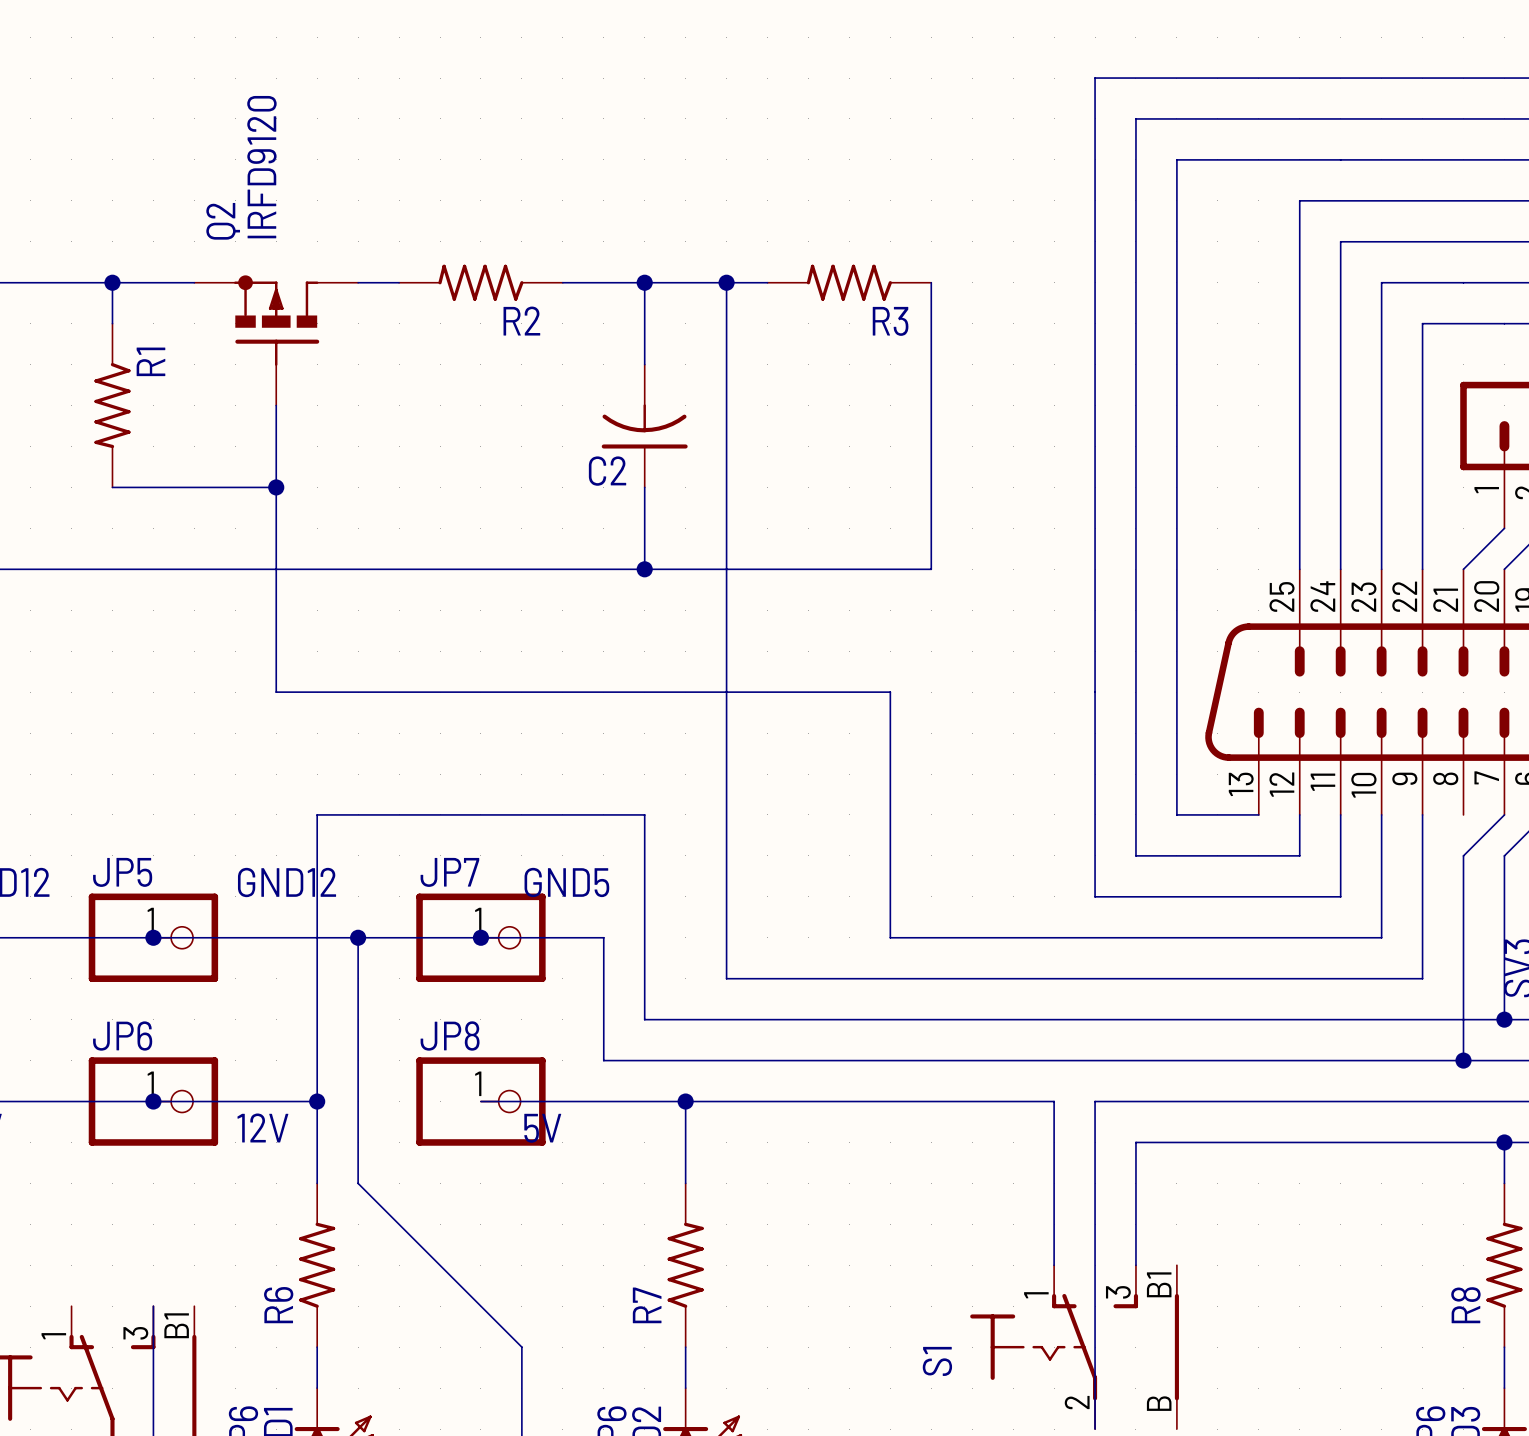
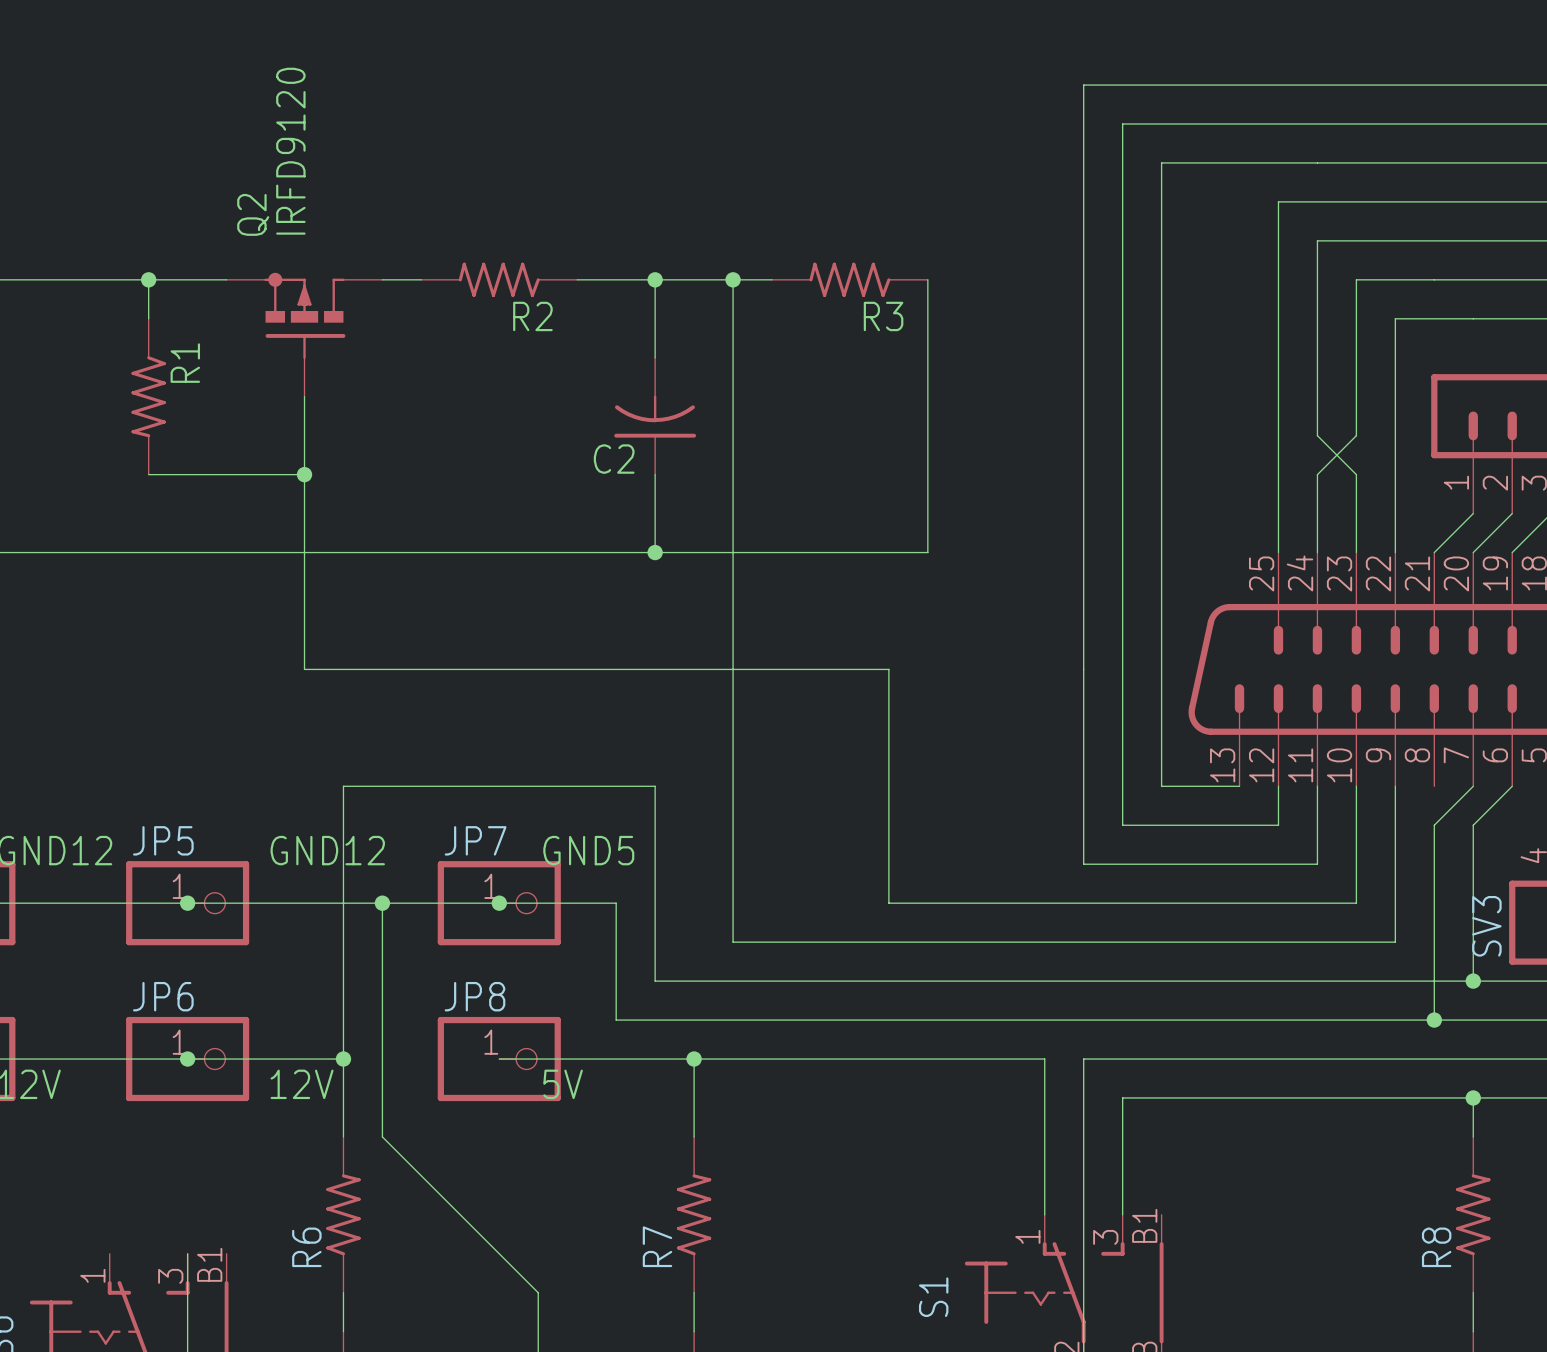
wire: (1340, 446) (1340, 487) -> (1317, 435) (1356, 474)
wire: (1381, 446) (1381, 487) -> (1356, 435) (1317, 474)

